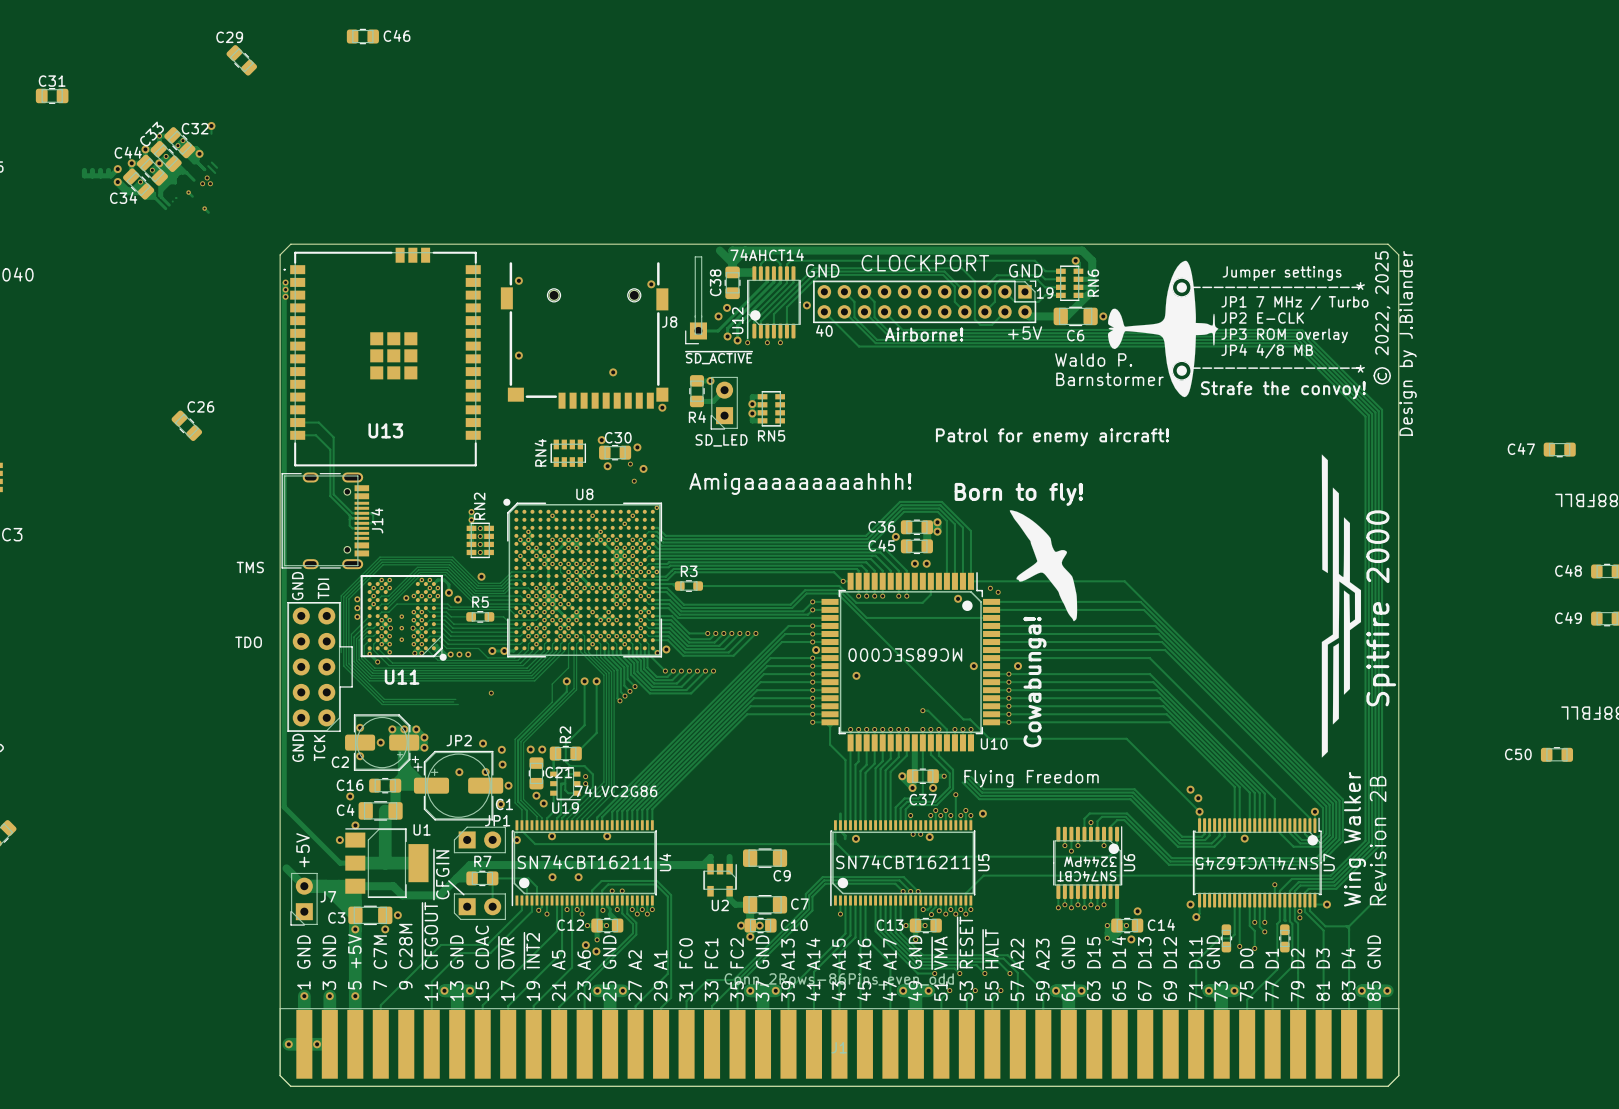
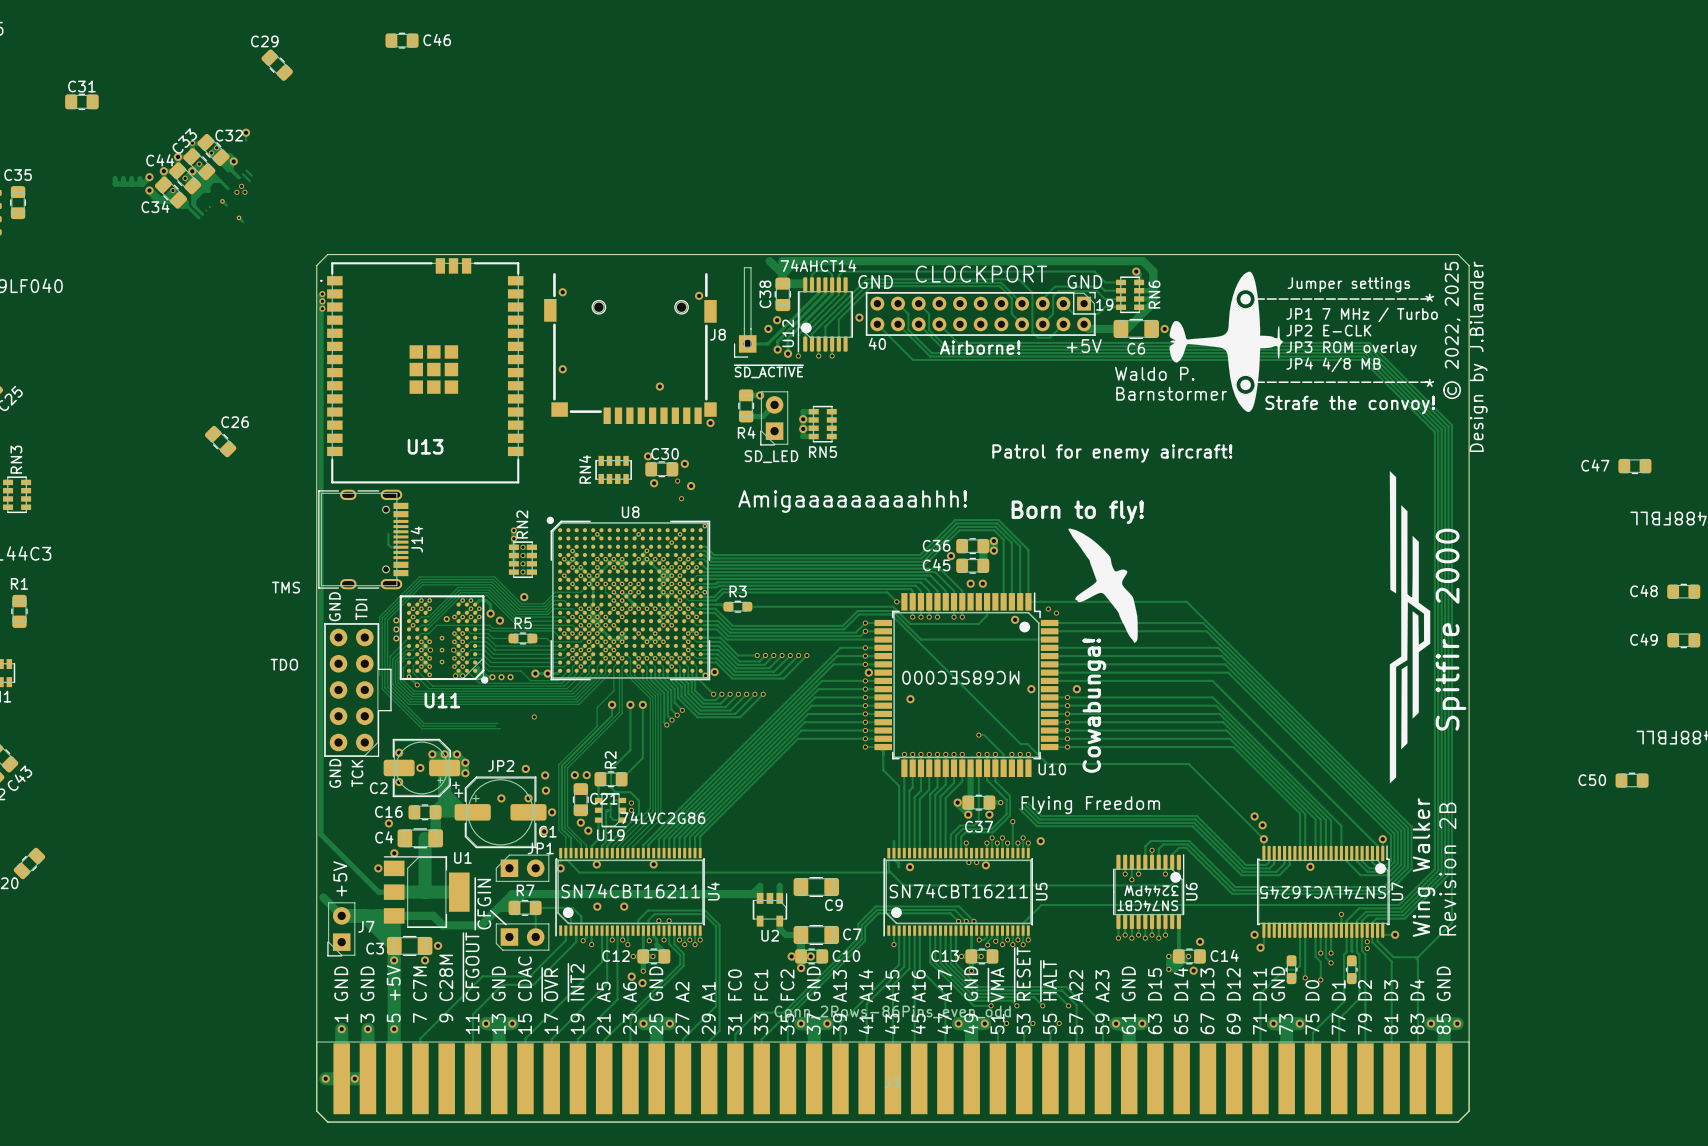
track: (297, 422) (318, 422) (333, 437) (333, 494) (352, 513) (371, 513) (373, 515) (371, 523) (361, 523) -> none
track: (297, 435) (315, 435) (330, 449) (330, 496) (352, 518) -> none

